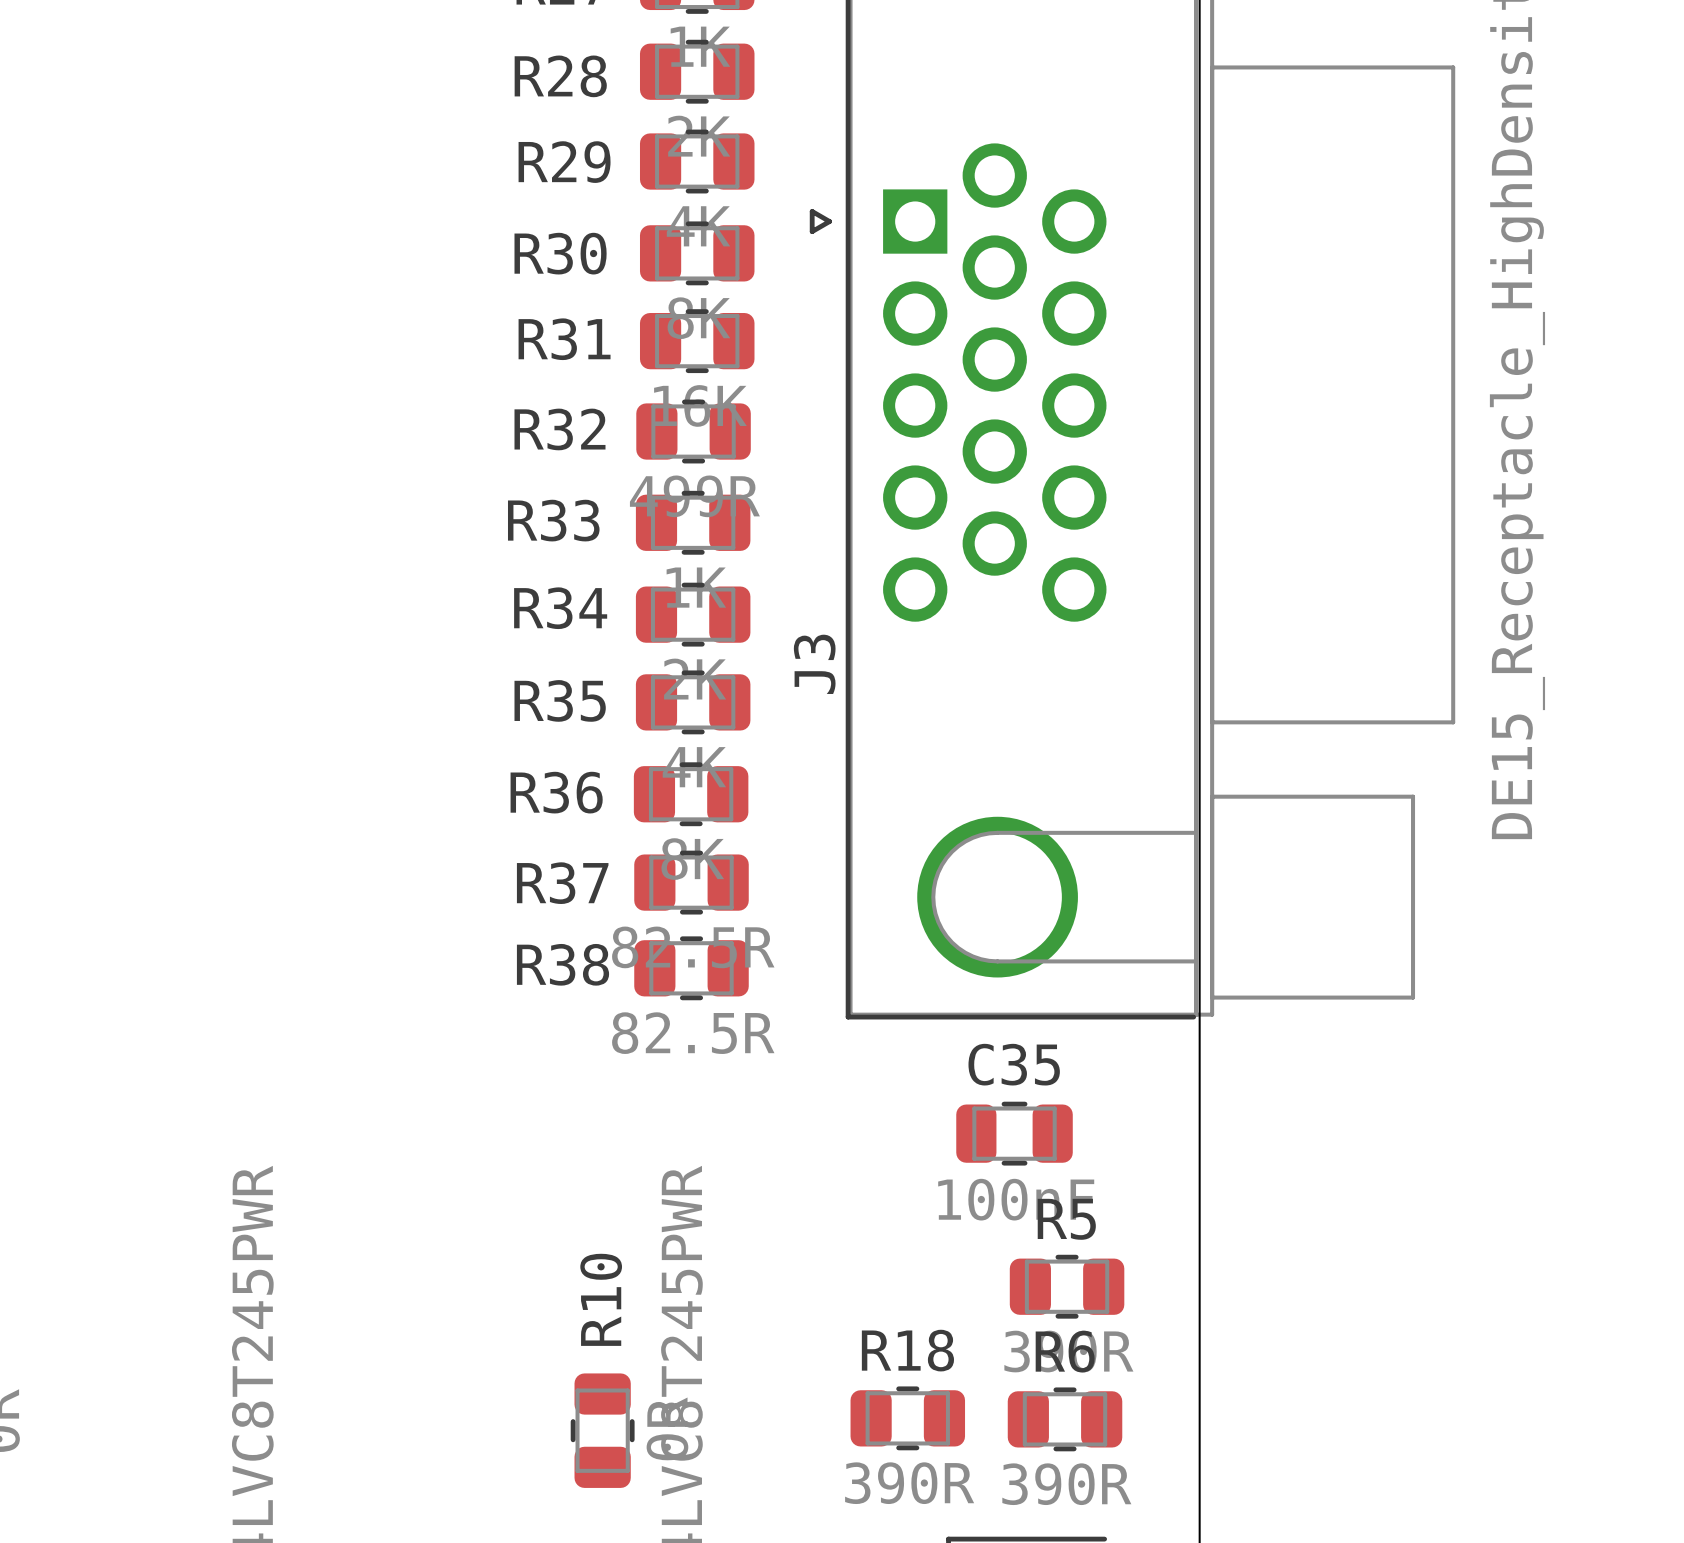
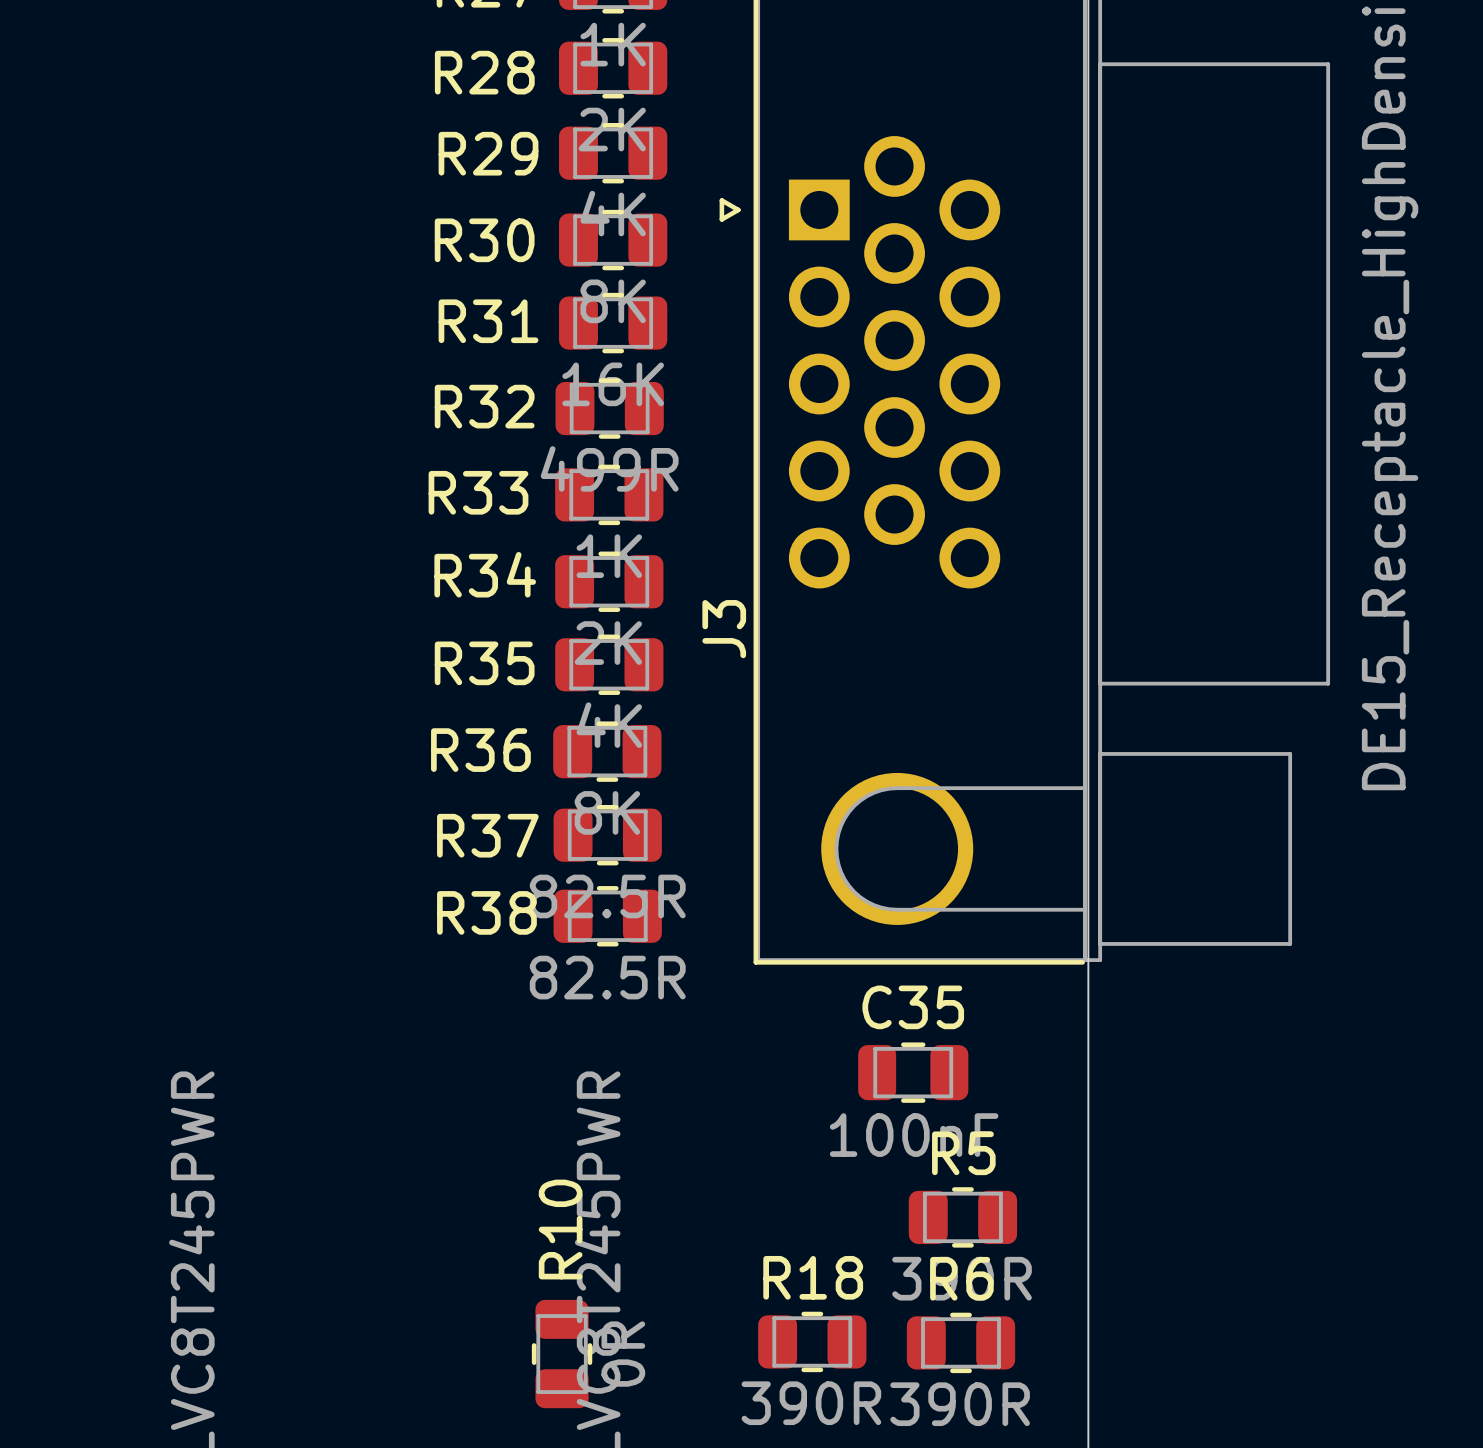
R10 position: (602, 1430) -> (562, 1354)

